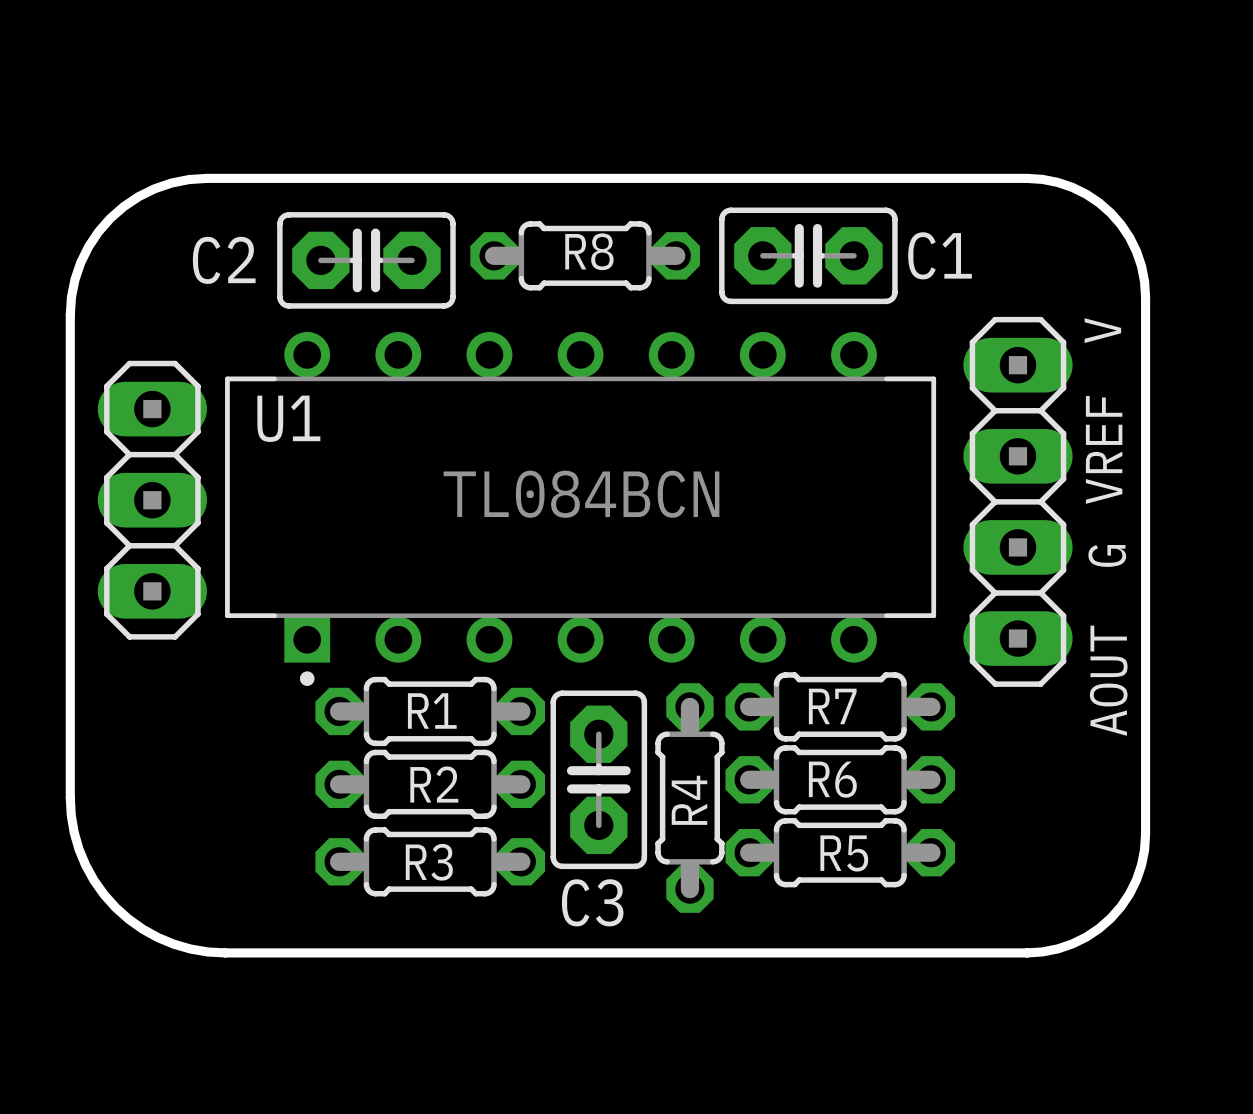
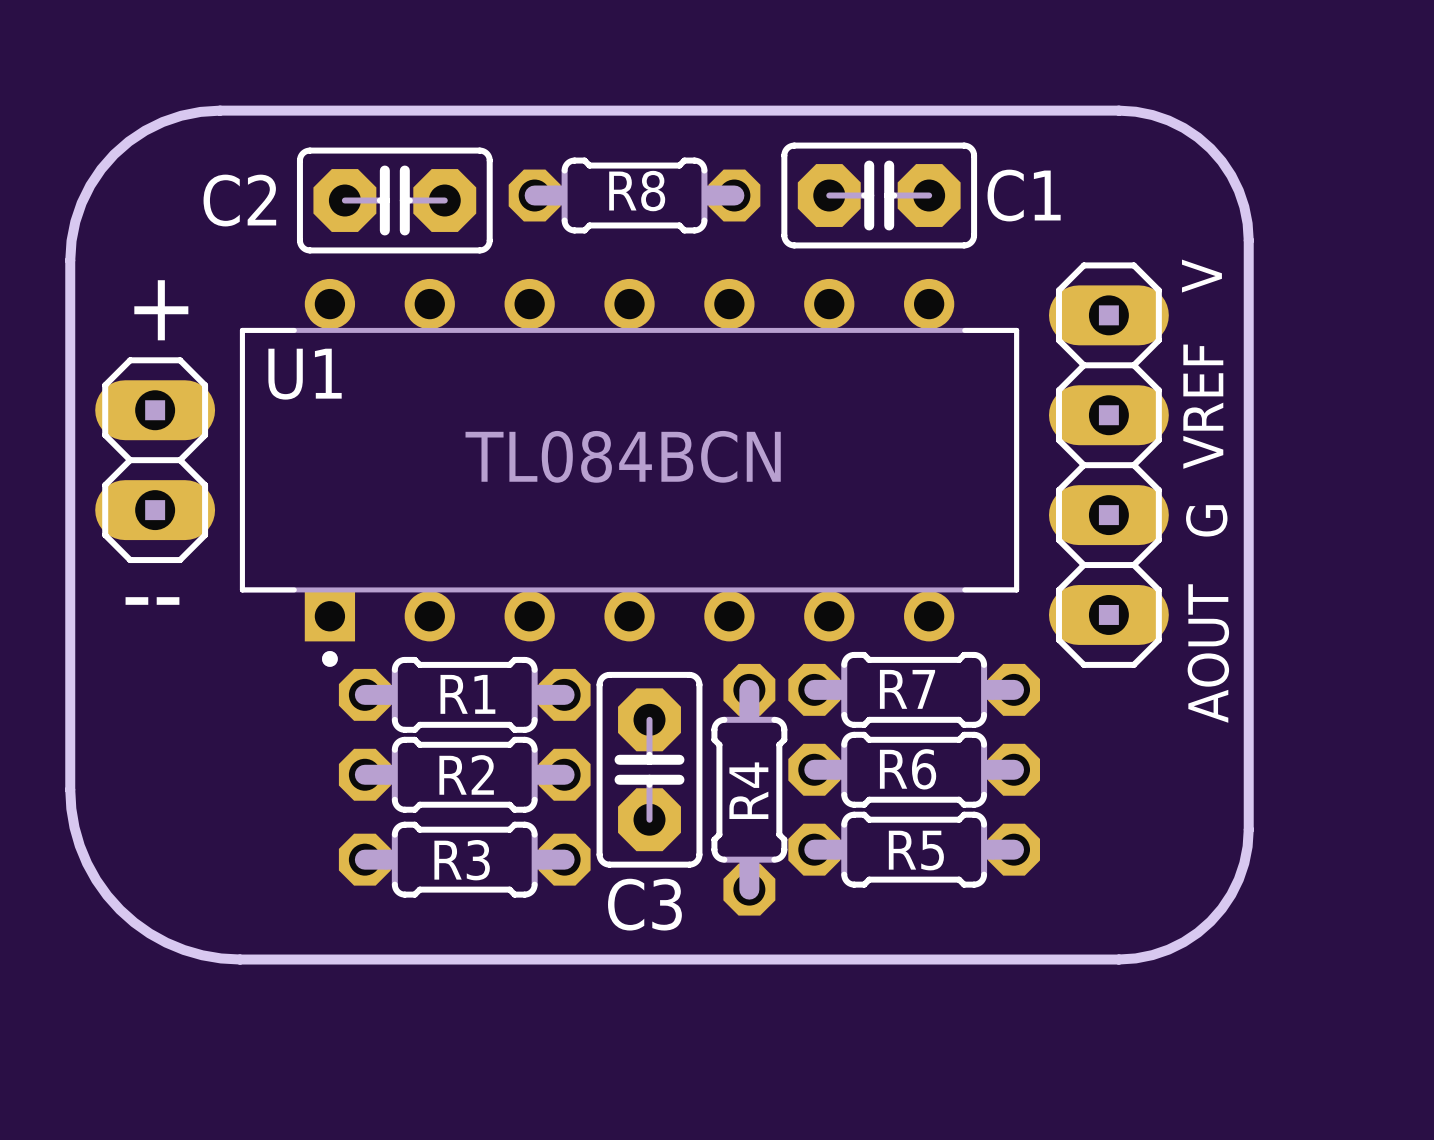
part footprint: [97, 360, 208, 640] -> [95, 357, 216, 564]
text: none -> + (161, 310)
text: none -> -- (152, 601)

